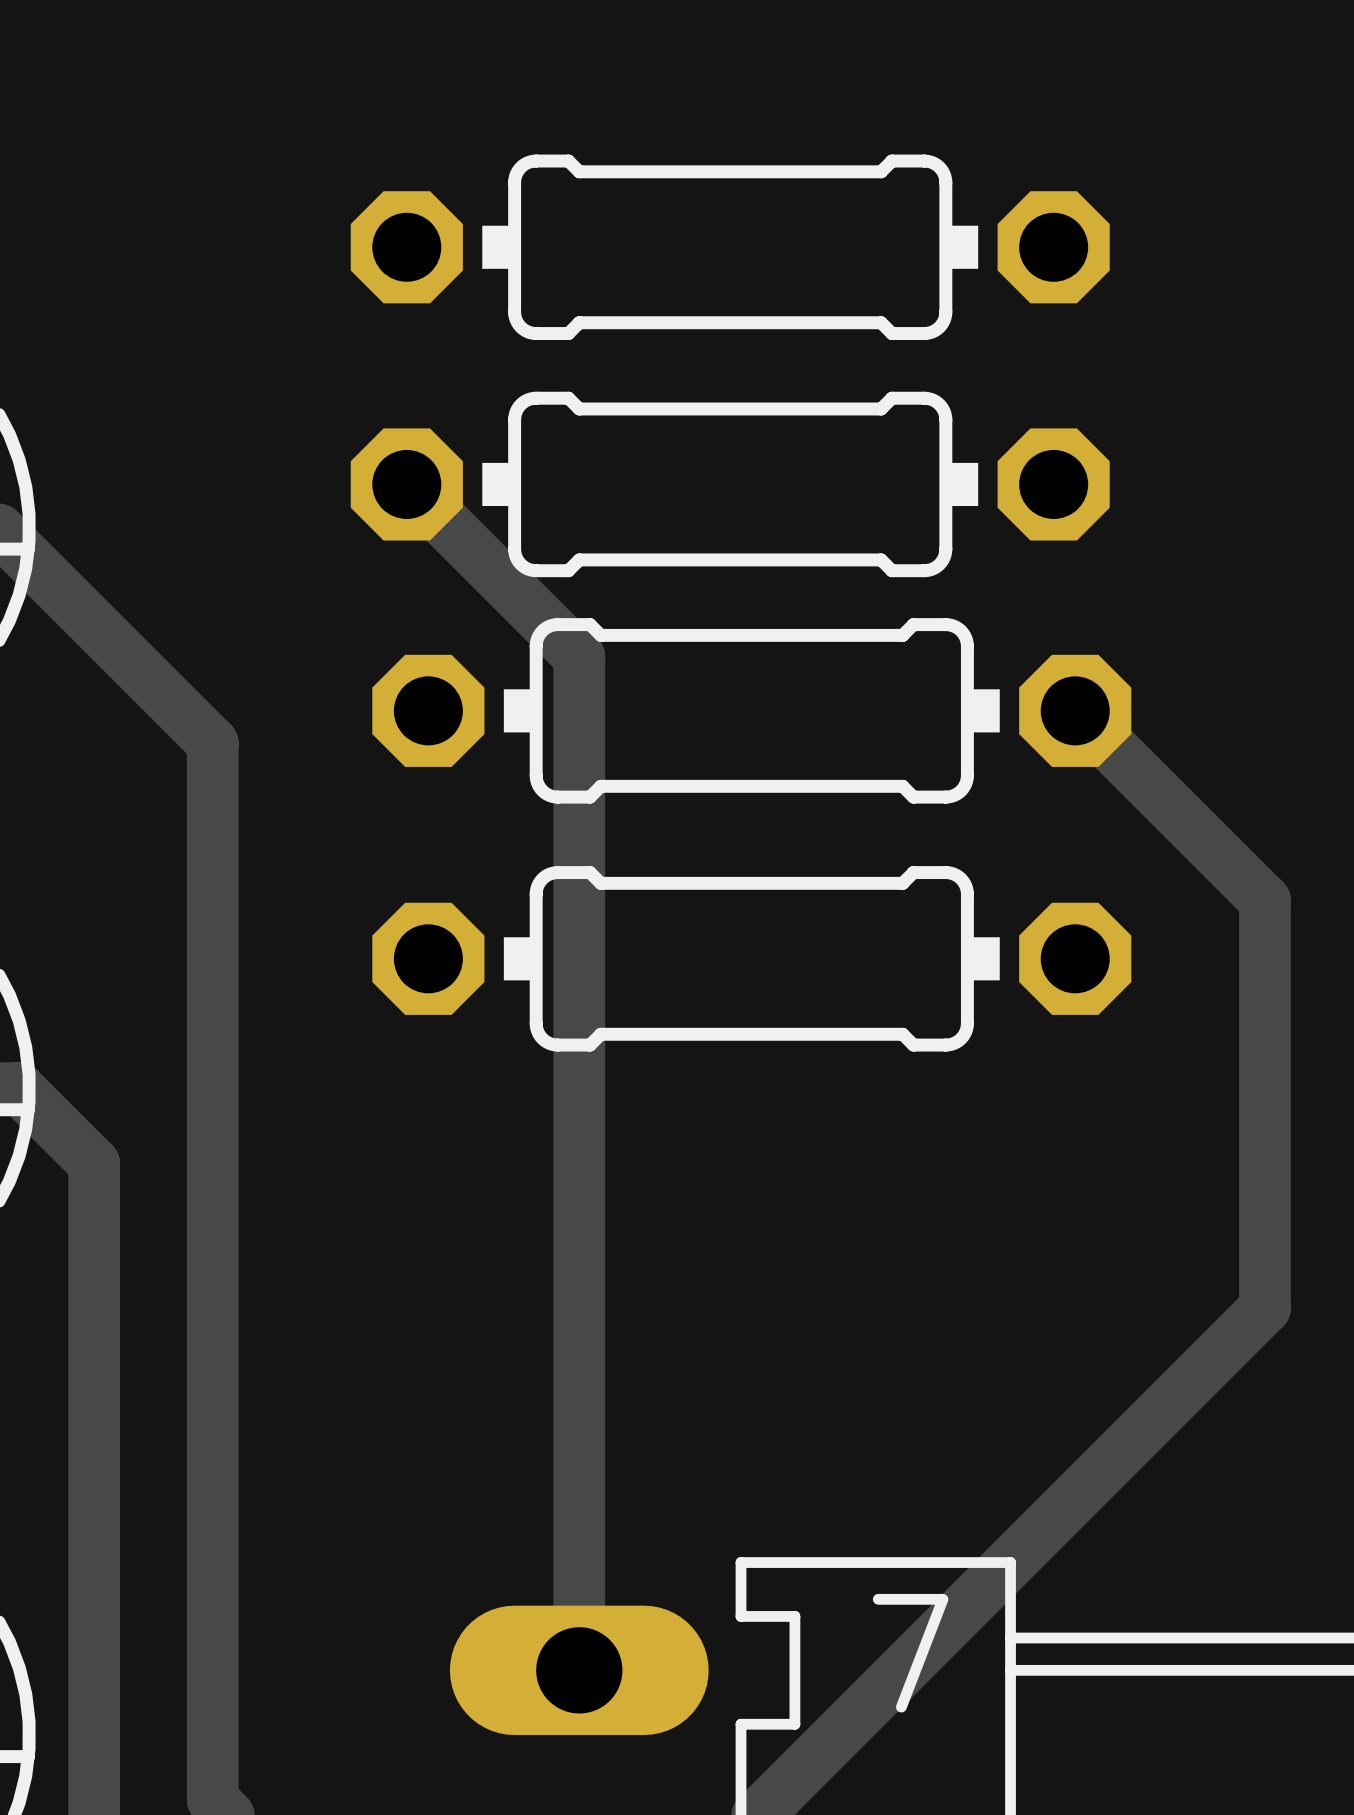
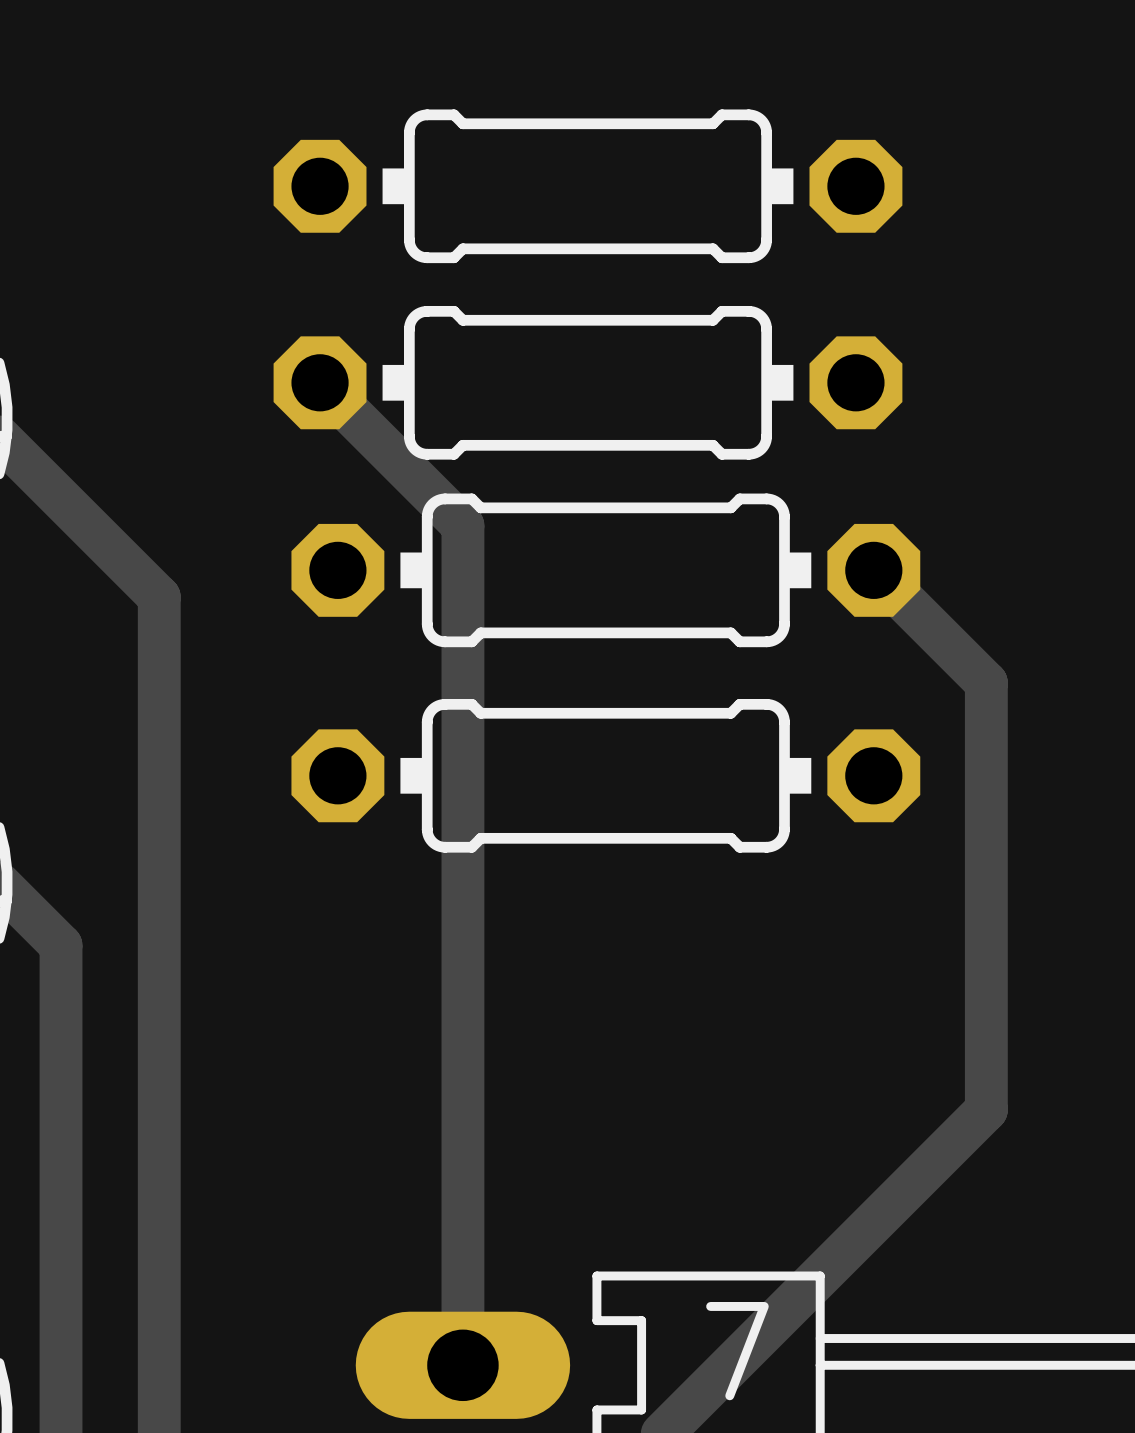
track: (1211, 846) (1264, 900) (1264, 1308) (1211, 1362) -> (986, 682) (986, 1109)

